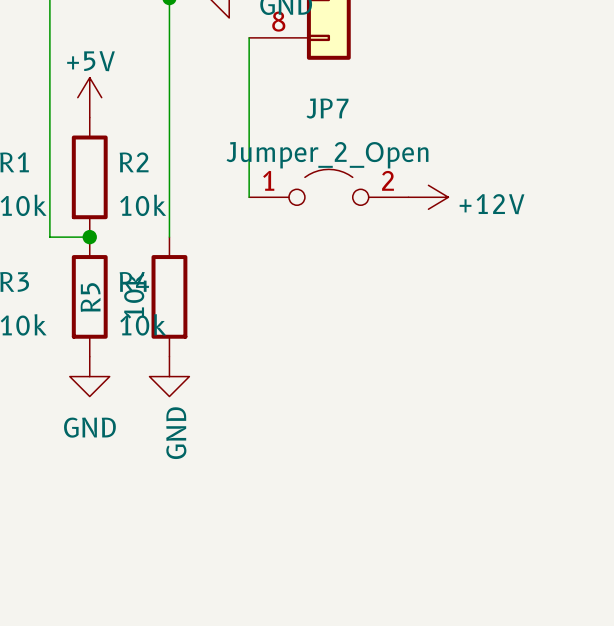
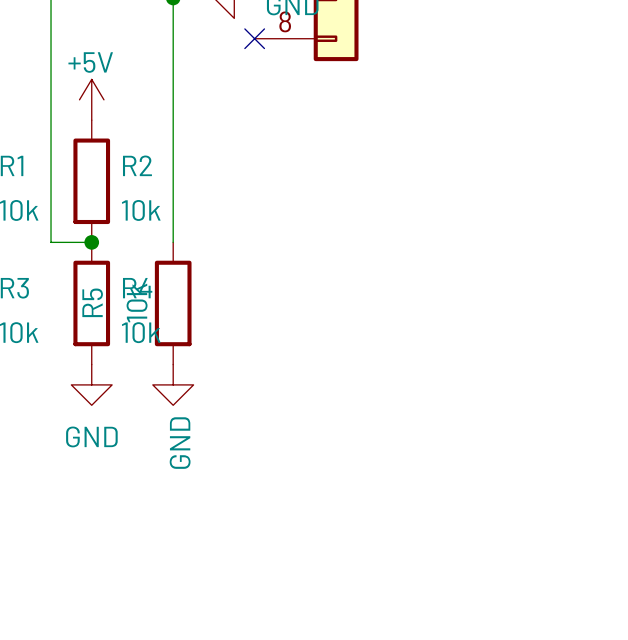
wire: (249, 37) (249, 197) -> none
no-connect mark: none -> (254, 38)
JP7: Jumper_2_Open (328, 187) -> none
power symbol: +12V (428, 197) -> none

